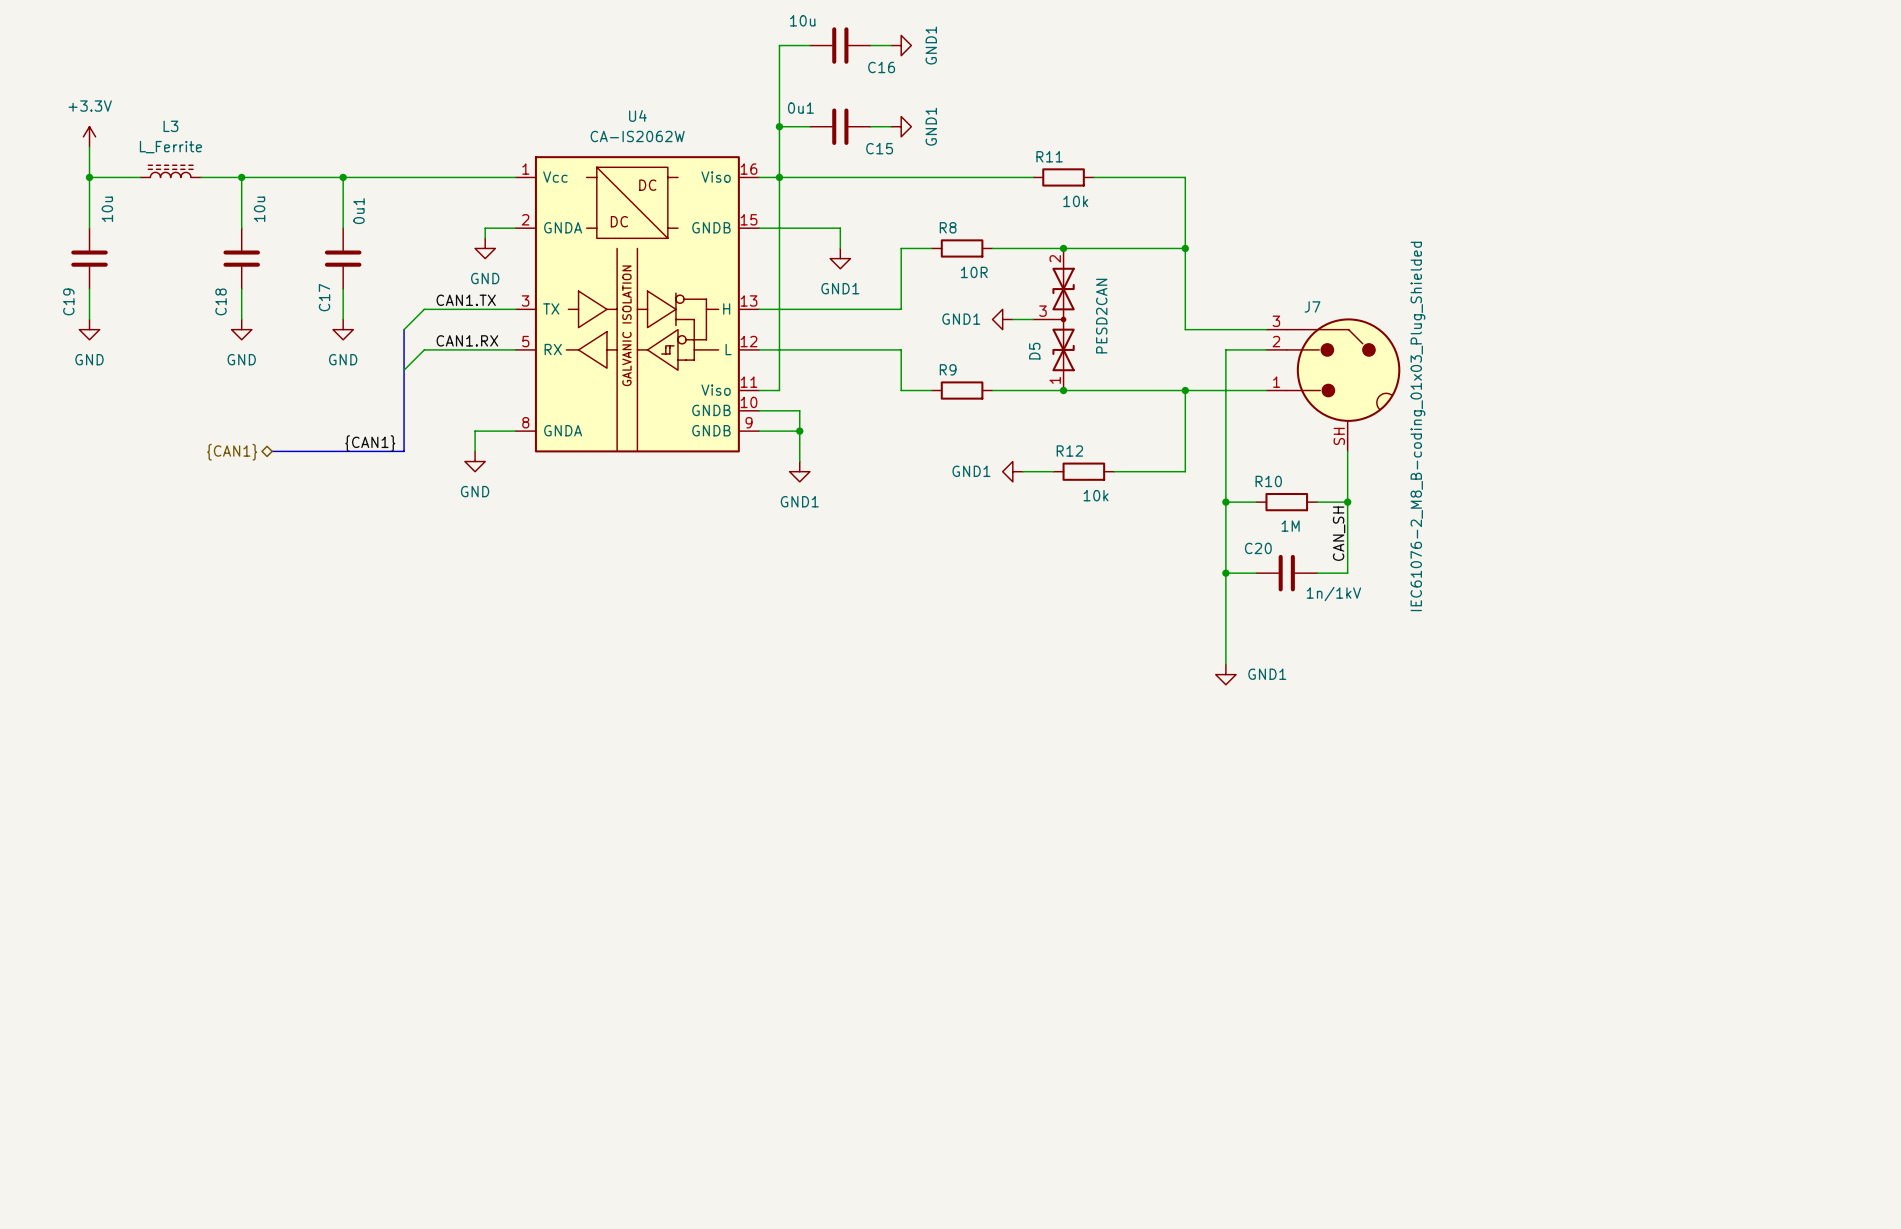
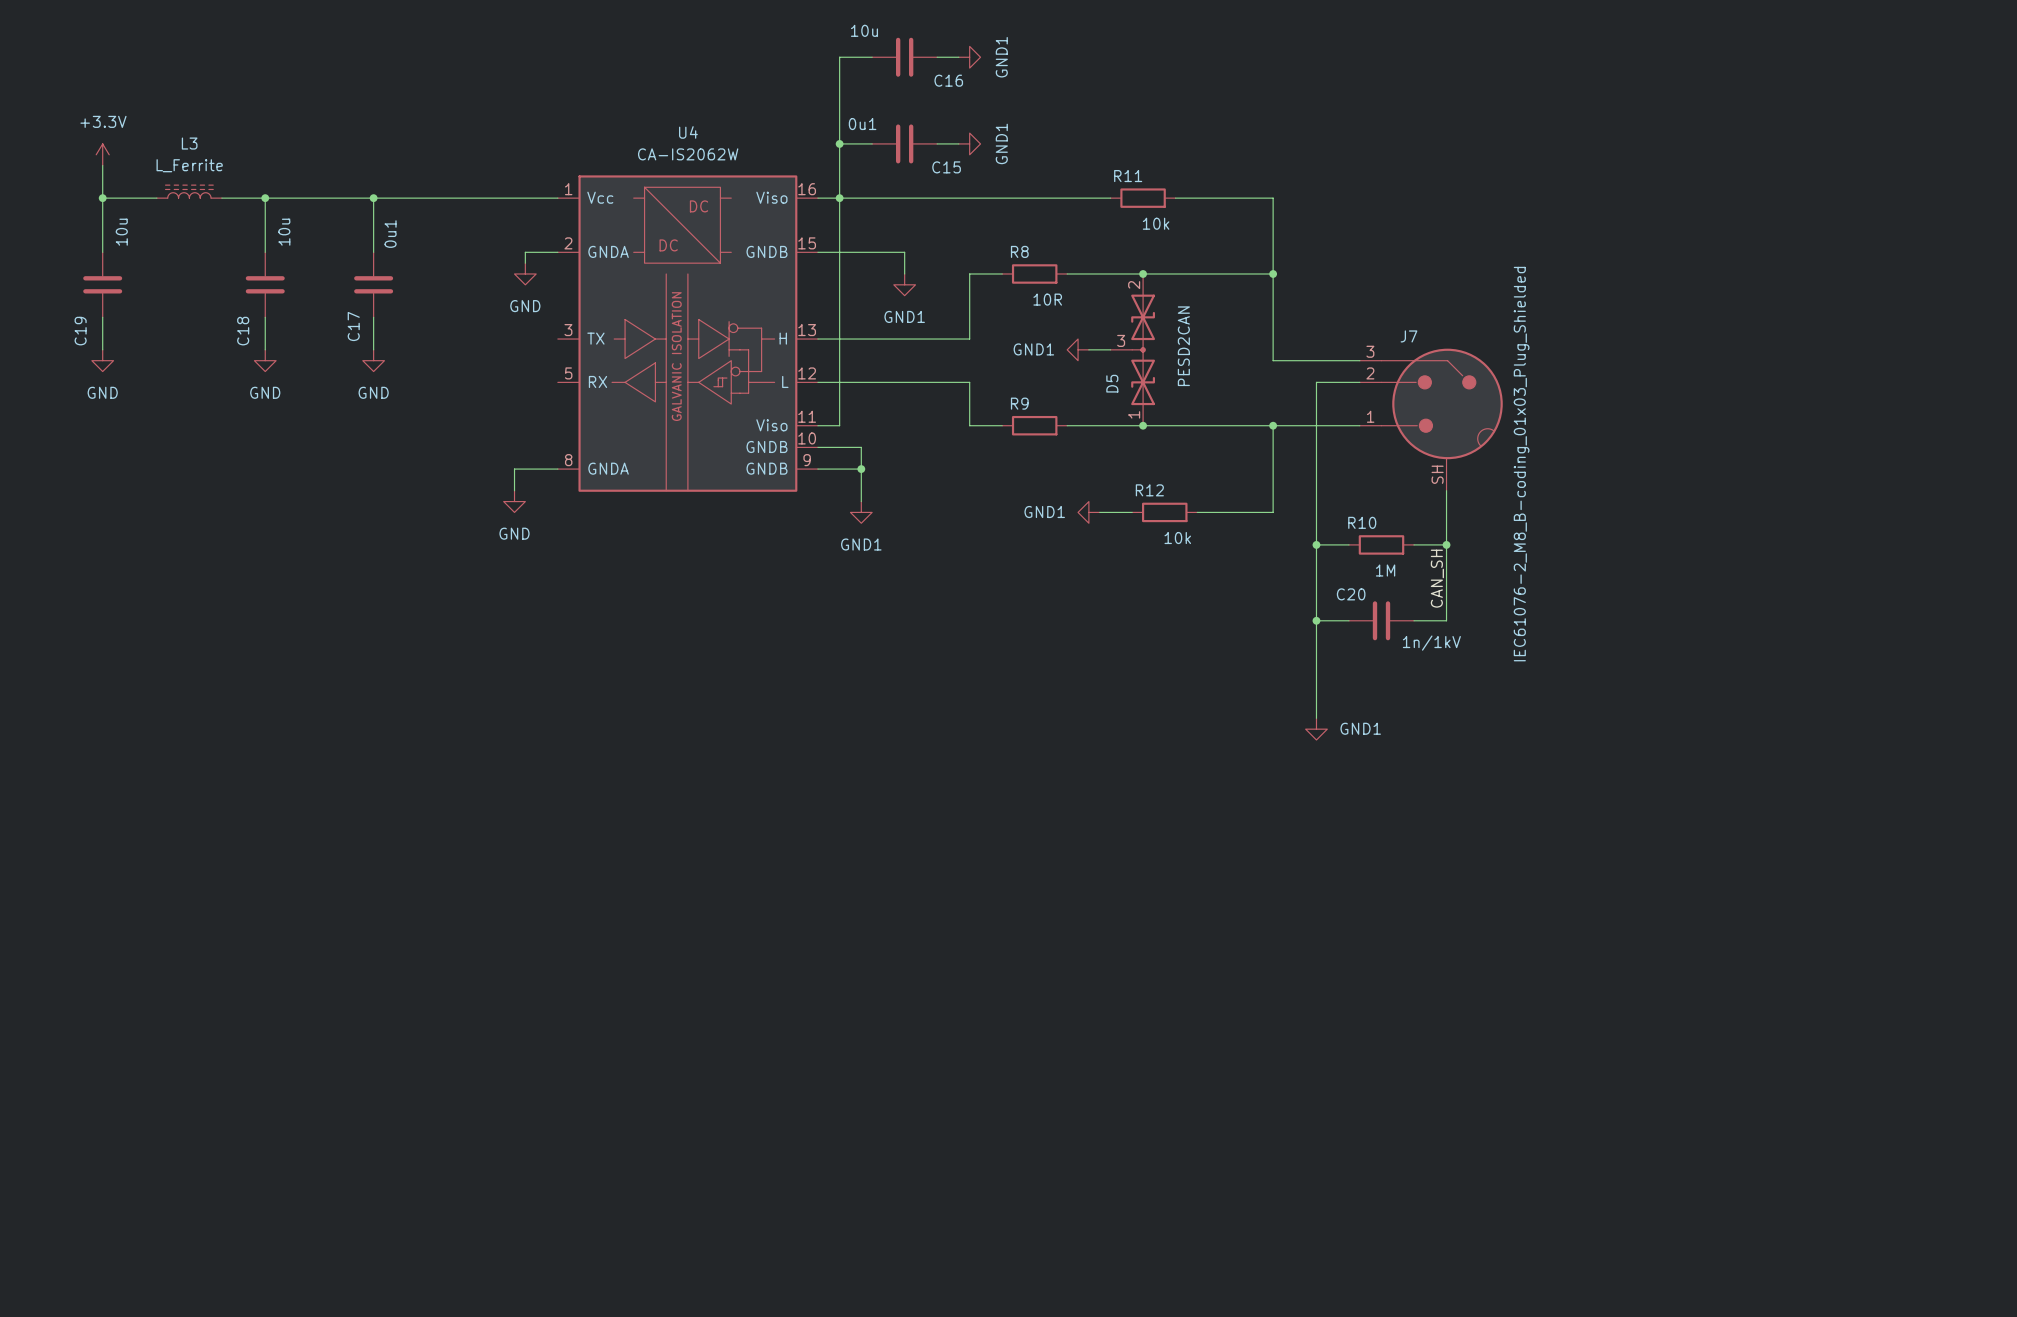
label: CAN1.TX (466, 300) -> none
wire: (515, 309) (424, 309) (404, 329) -> none
bus: (404, 329) (404, 451) (272, 451) -> none
label: CAN1.RX (467, 340) -> none
wire: (515, 349) (424, 349) (404, 370) -> none
label: {CAN1} (370, 443) -> none
hierarchical label: {CAN1} (232, 452) -> none

